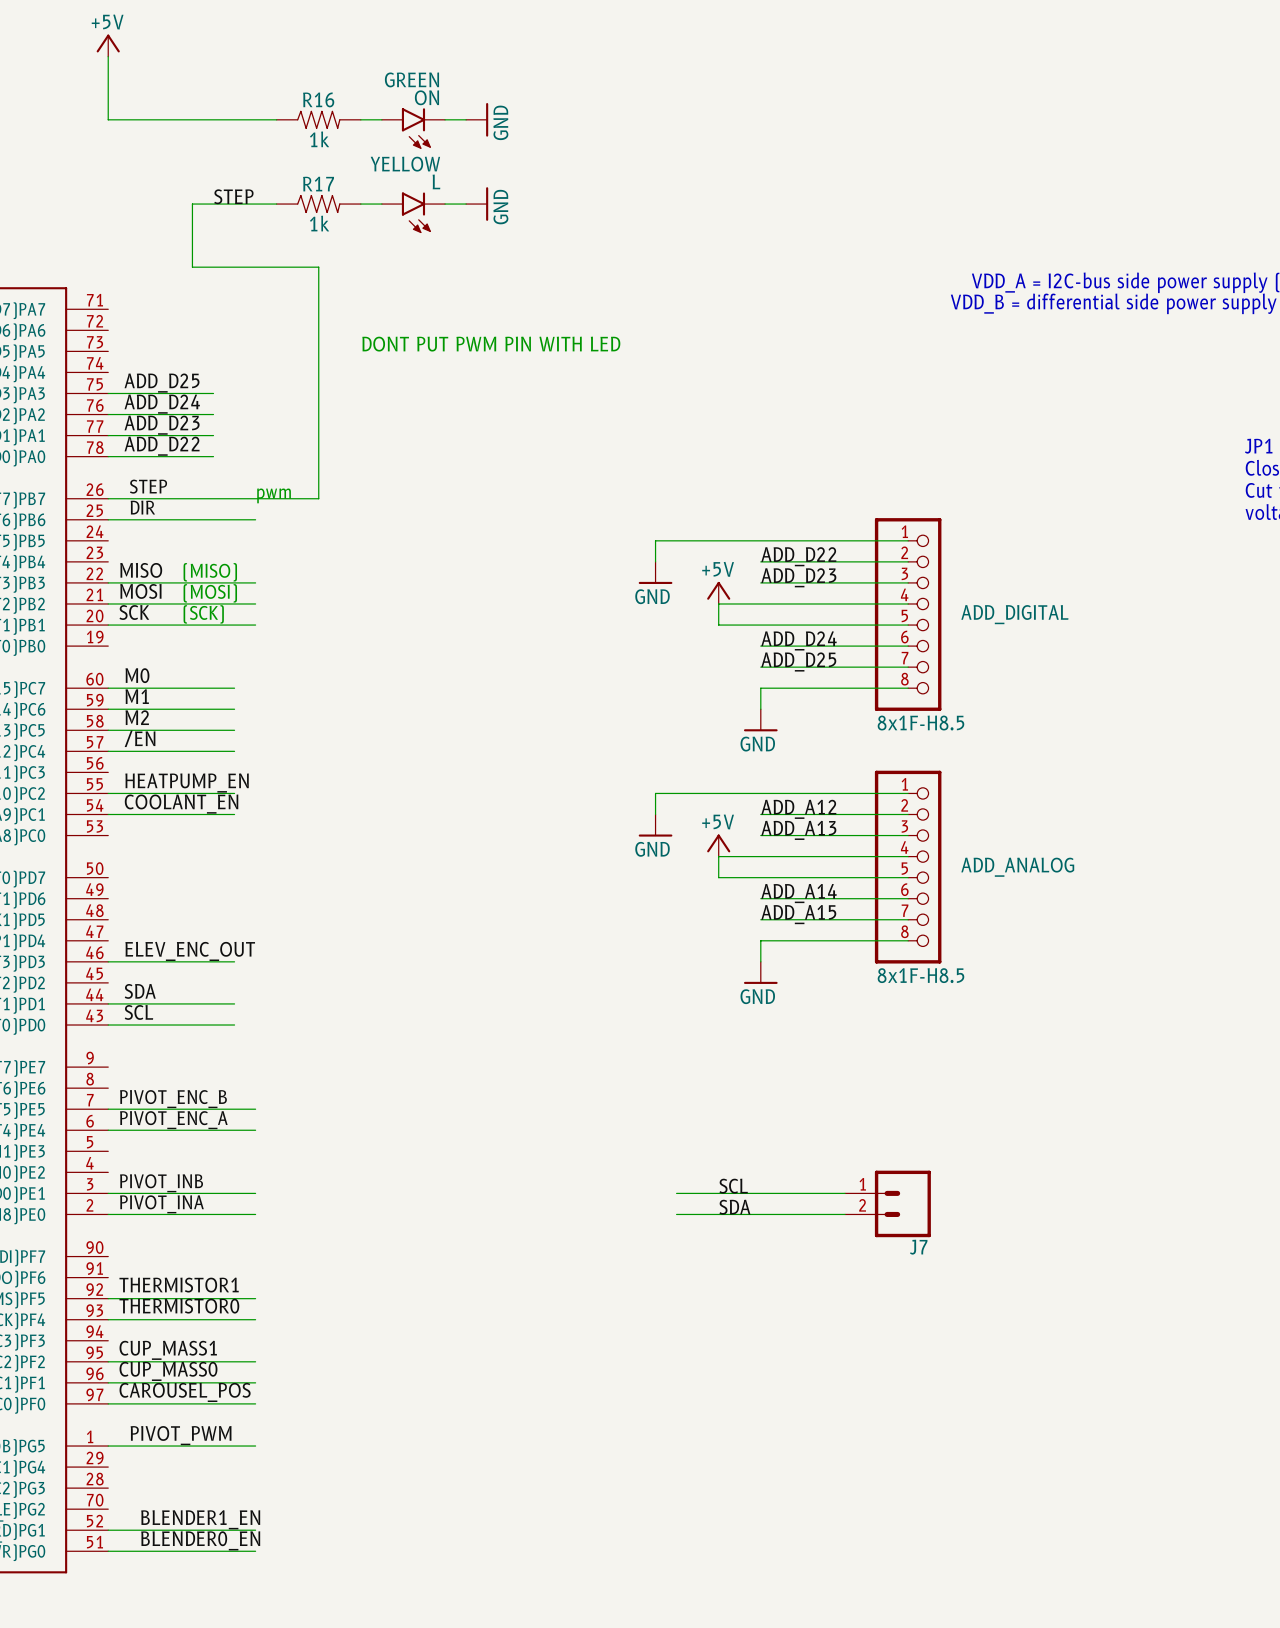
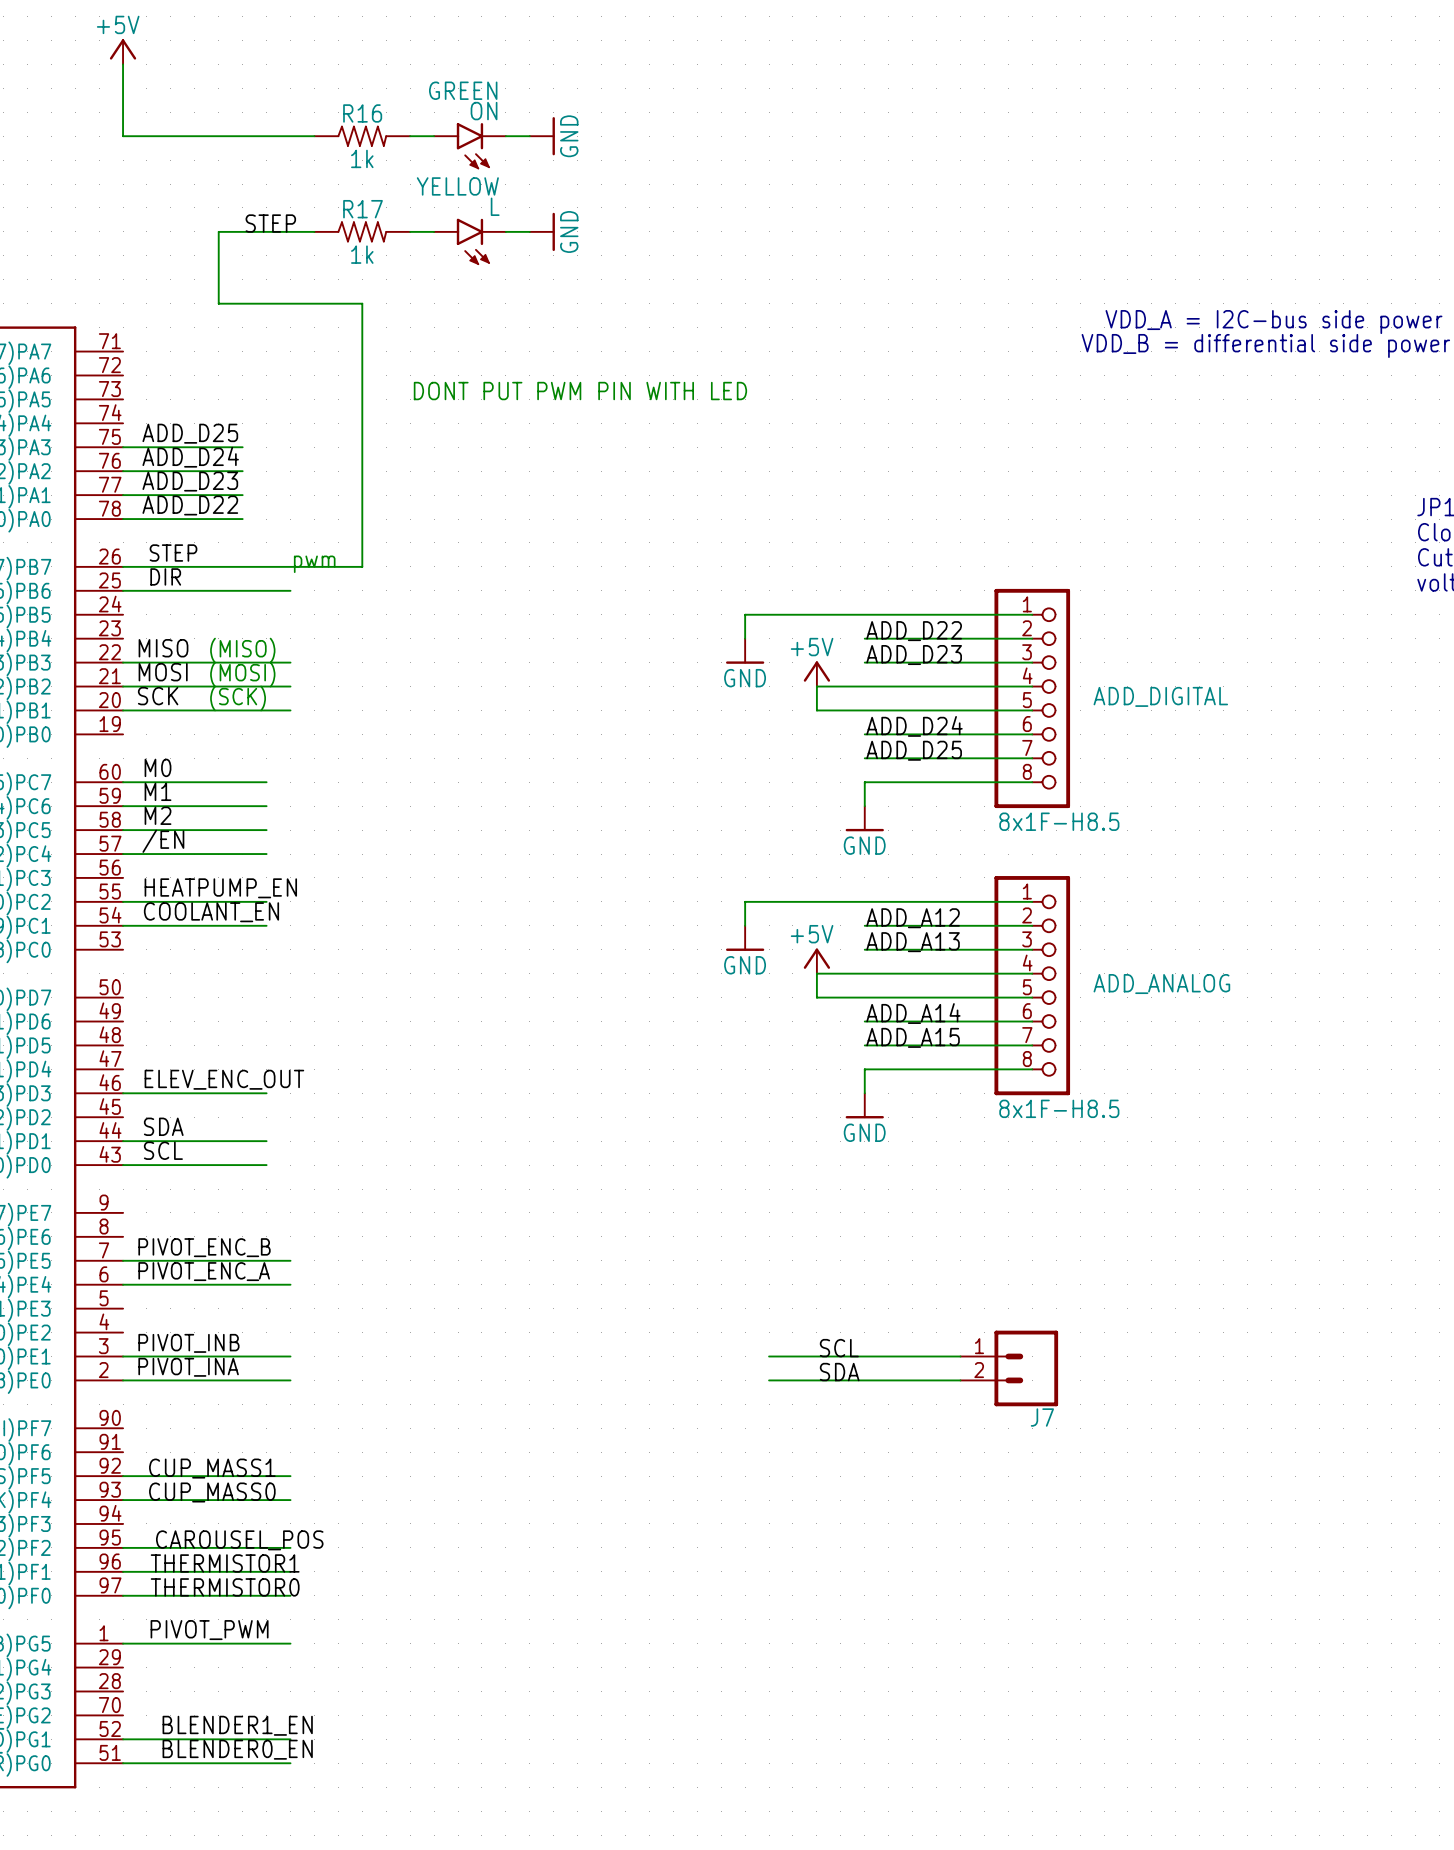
label position: THERMISTOR1 (179, 1285) -> THERMISTOR1 (225, 1563)
label position: THERMISTOR0 (179, 1306) -> THERMISTOR0 (225, 1587)
label position: CUP_MASS1 (168, 1350) -> CUP_MASS1 (212, 1468)
label position: CUP_MASS0 (168, 1371) -> CUP_MASS0 (212, 1492)
label position: CAROUSEL_POS (185, 1392) -> CAROUSEL_POS (239, 1540)

